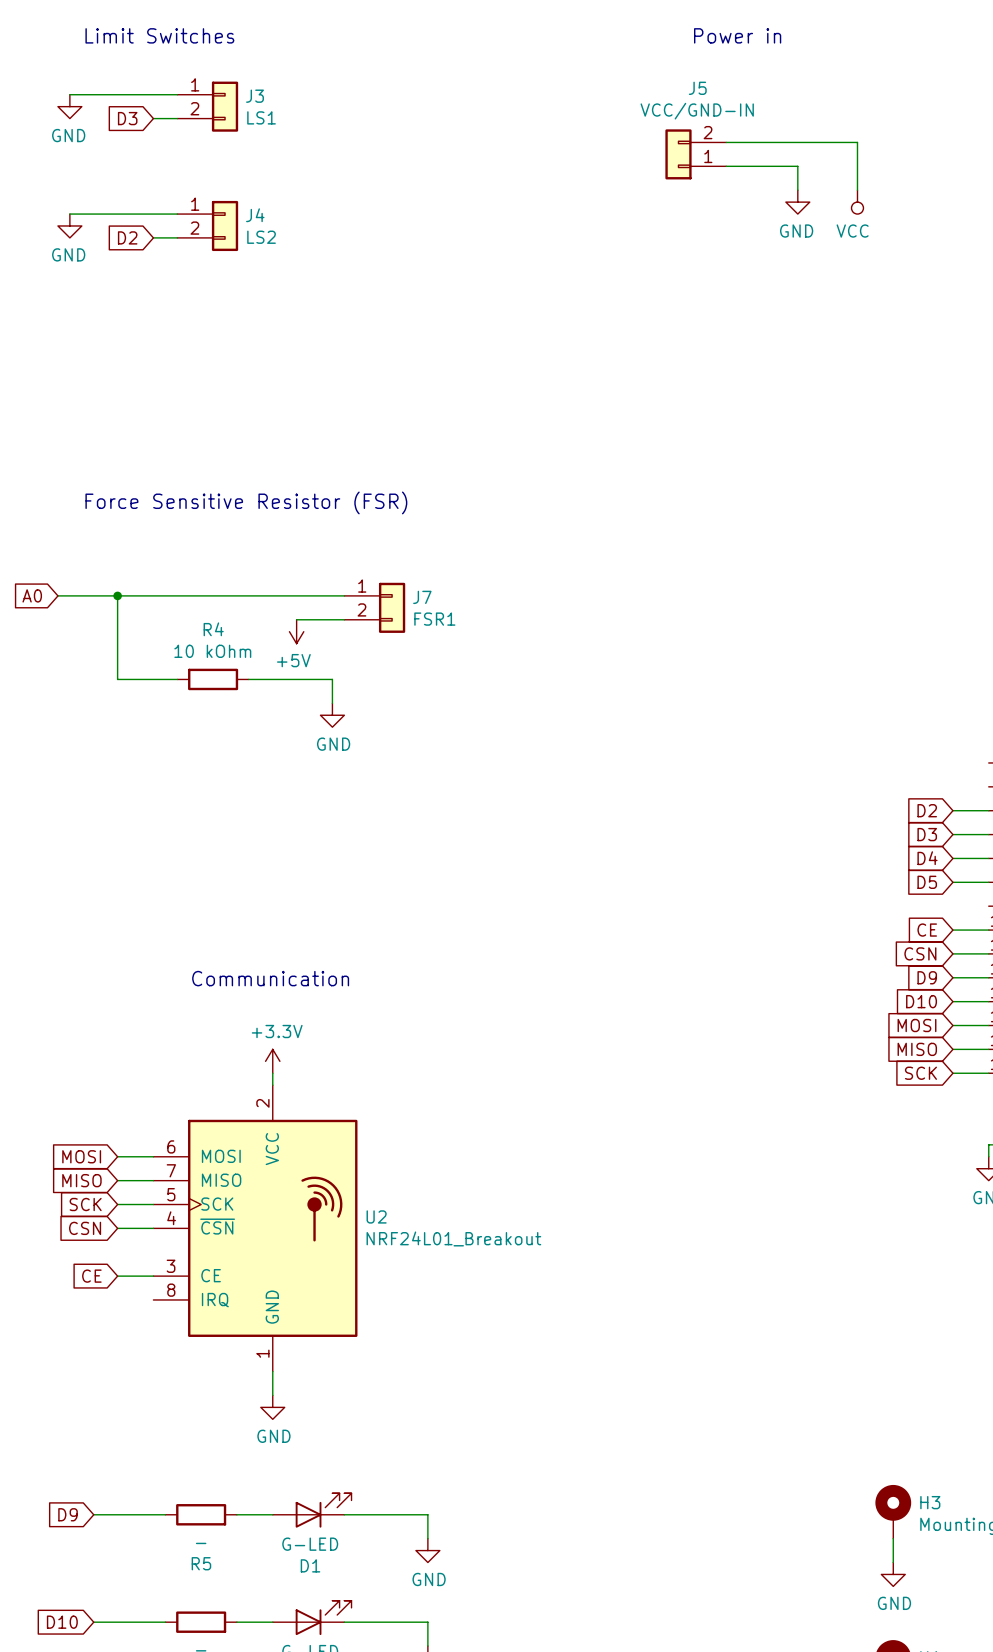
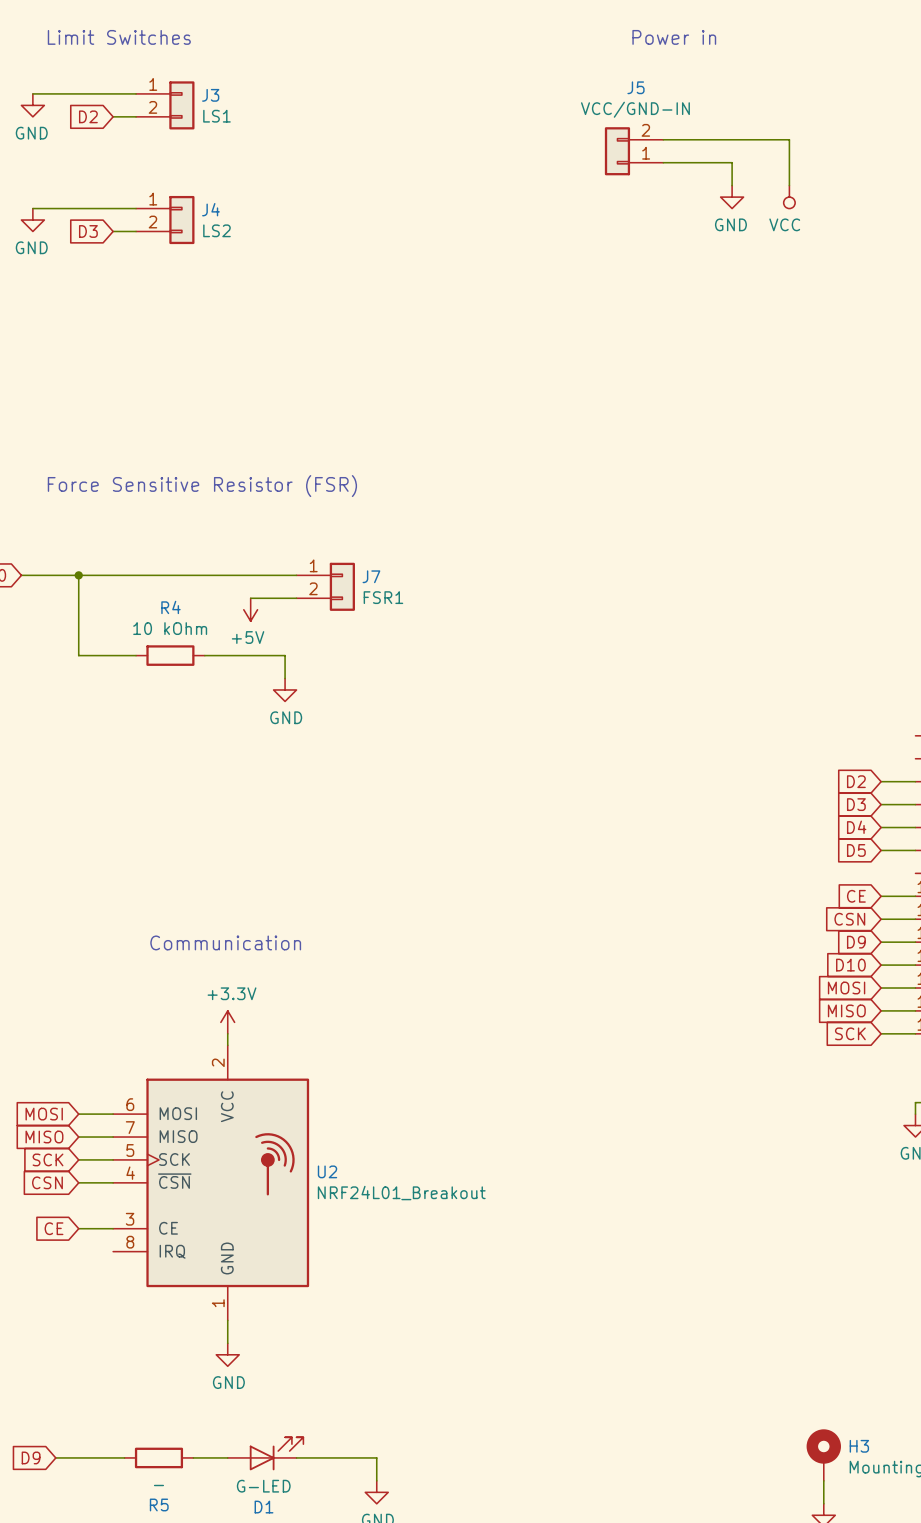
global label: D3 (127, 118) -> D2 (88, 116)
global label: D2 (127, 237) -> D3 (88, 231)

